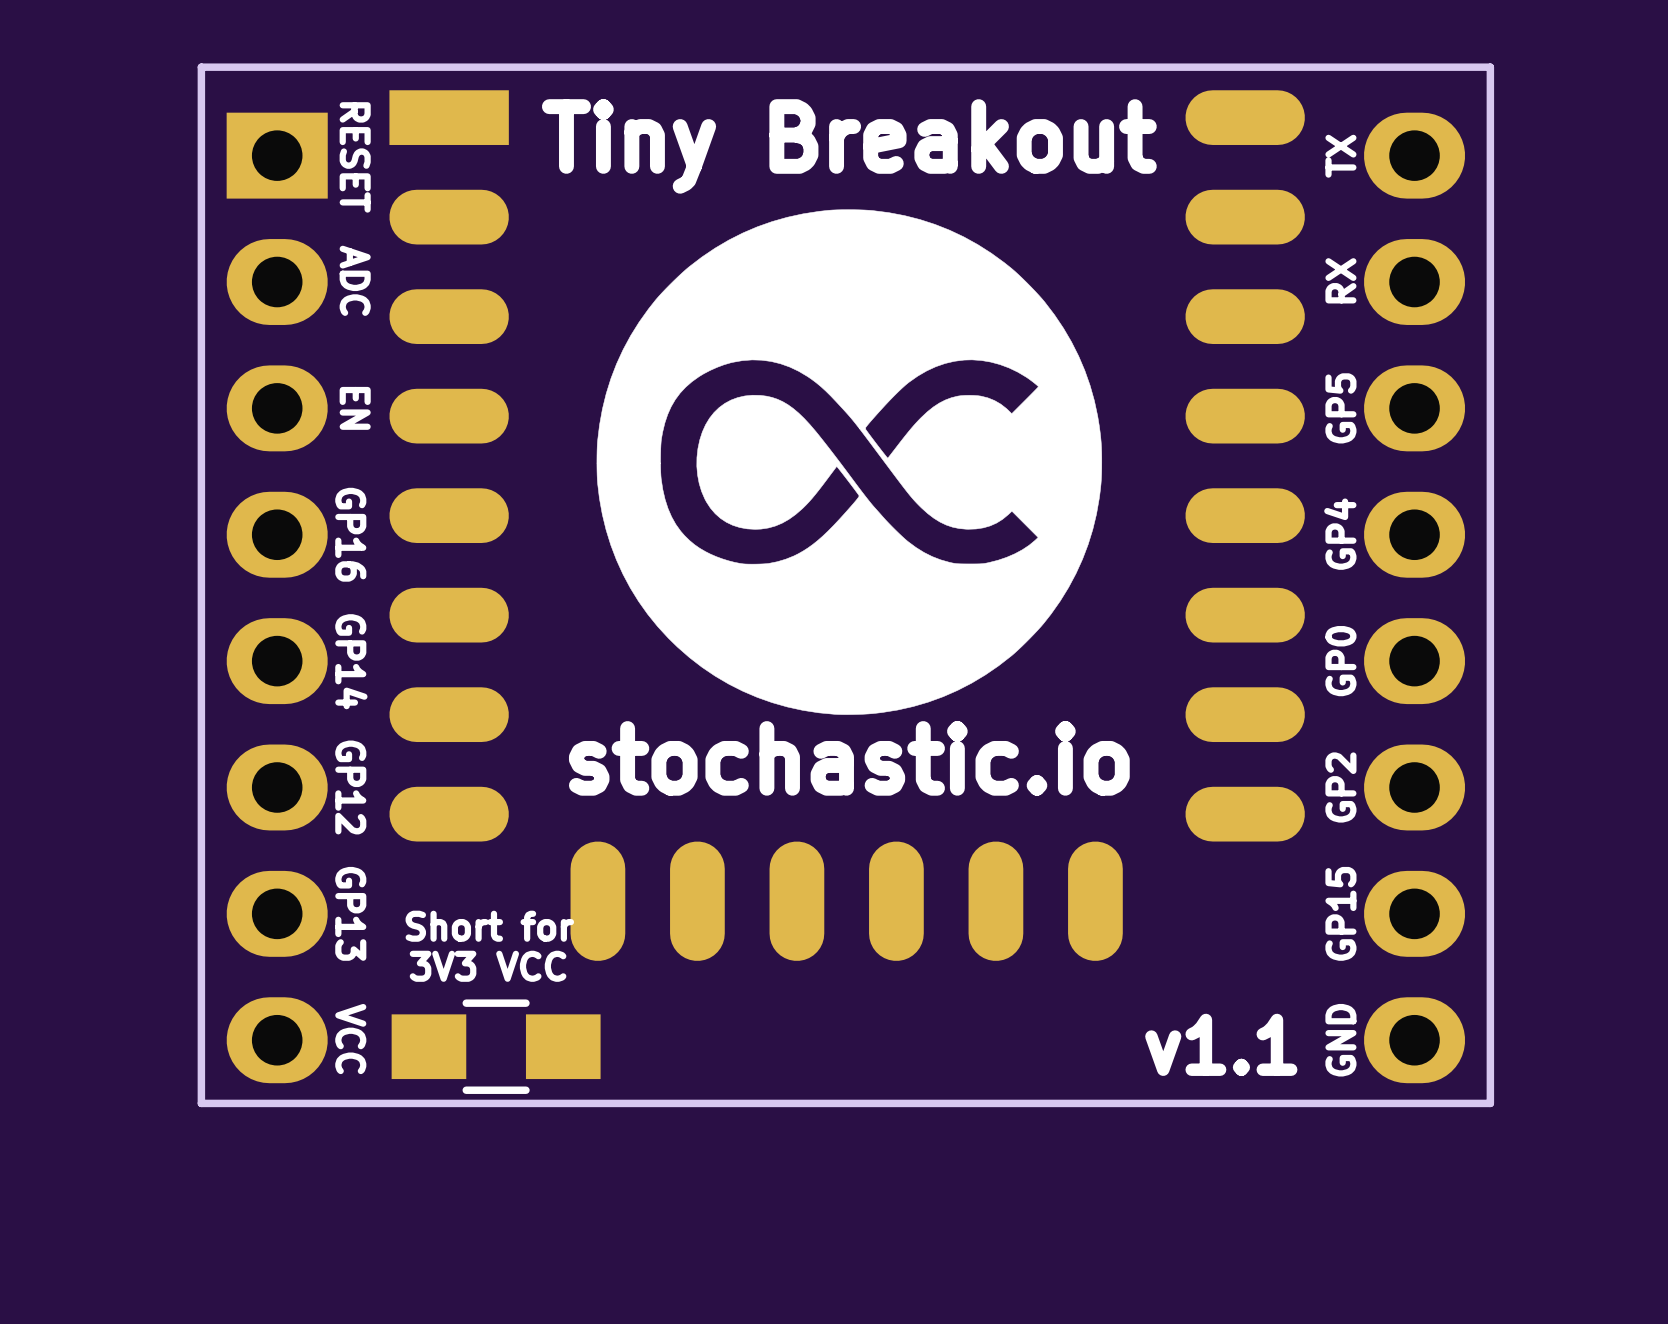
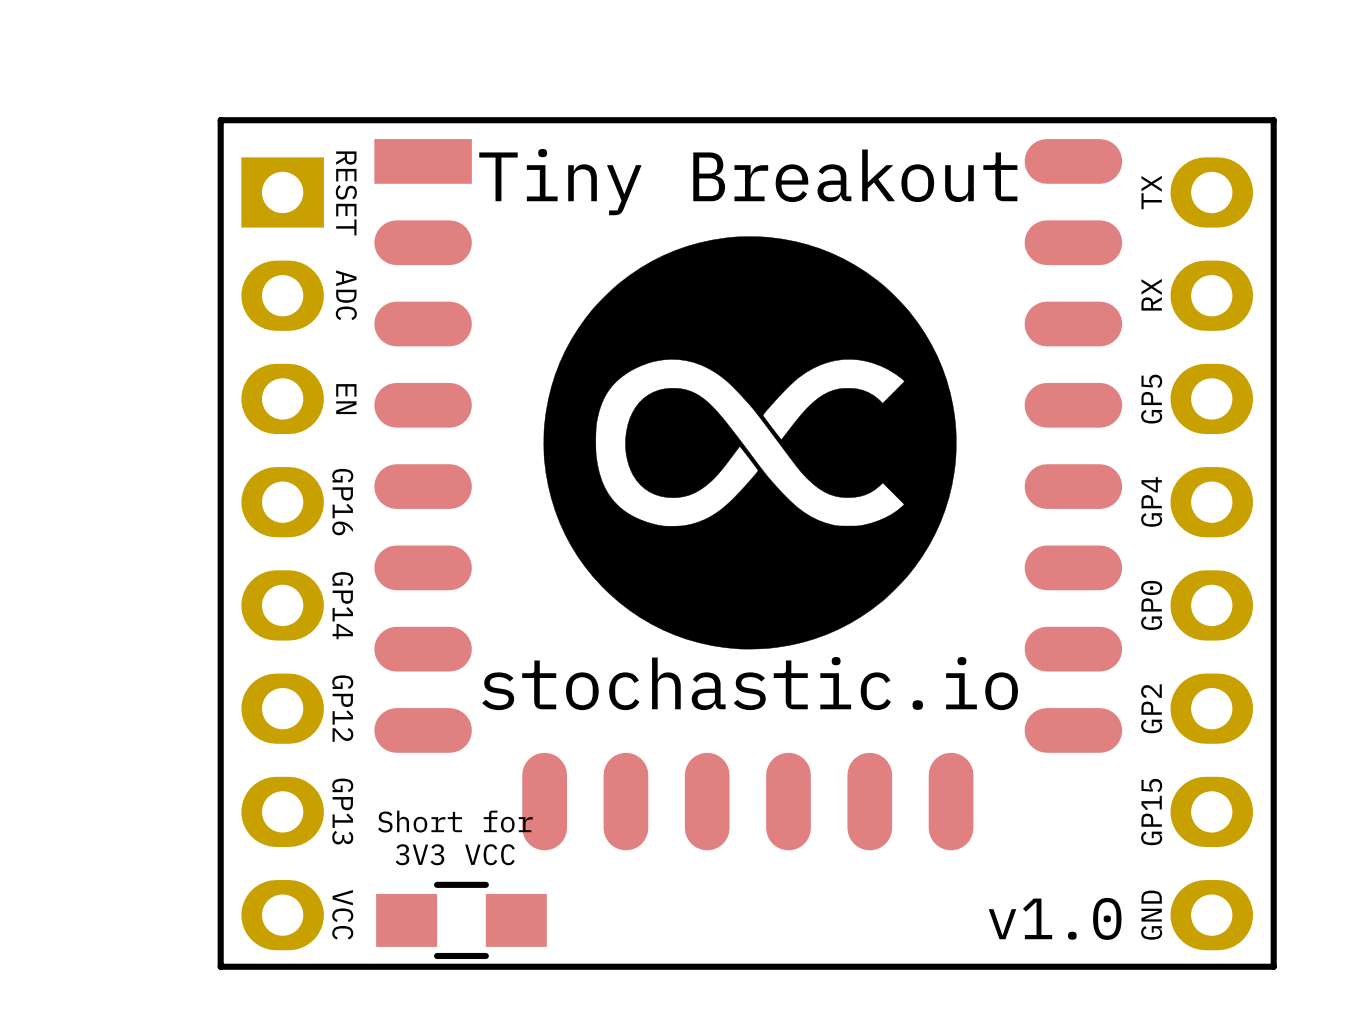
text: v1.1 (1221, 1044) -> v1.0 (1055, 918)

